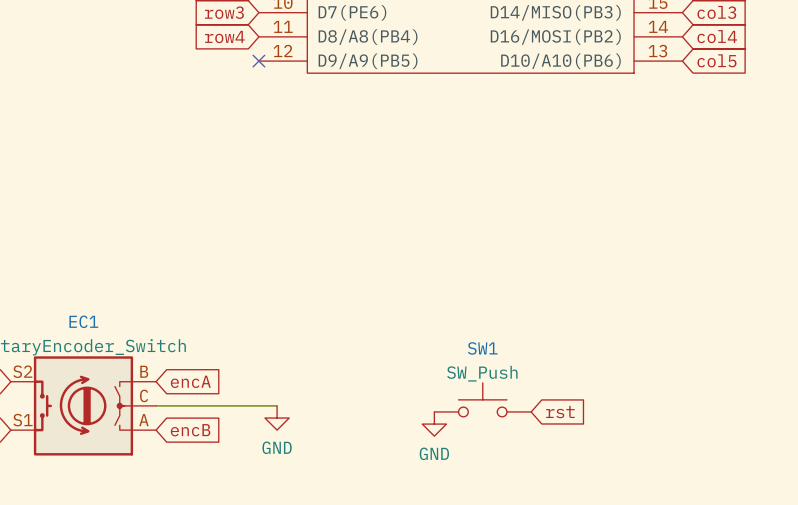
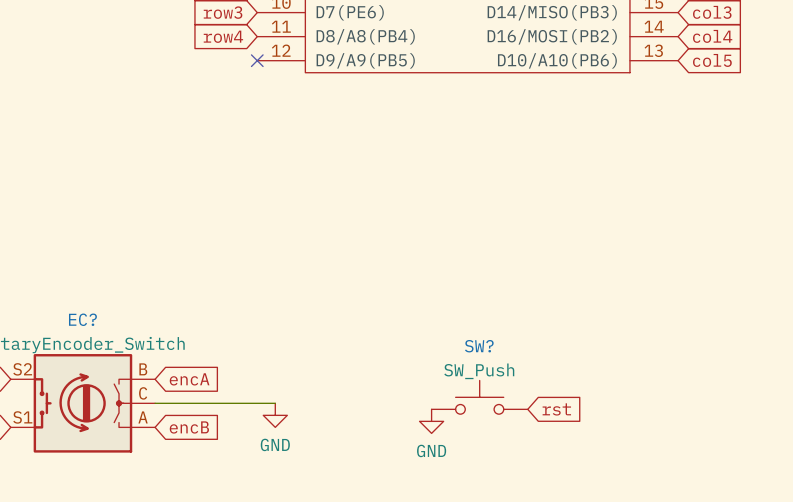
EC1 name: EC1 (83, 321) -> EC? (82, 319)
SW1 name: SW1 (482, 348) -> SW? (479, 346)

